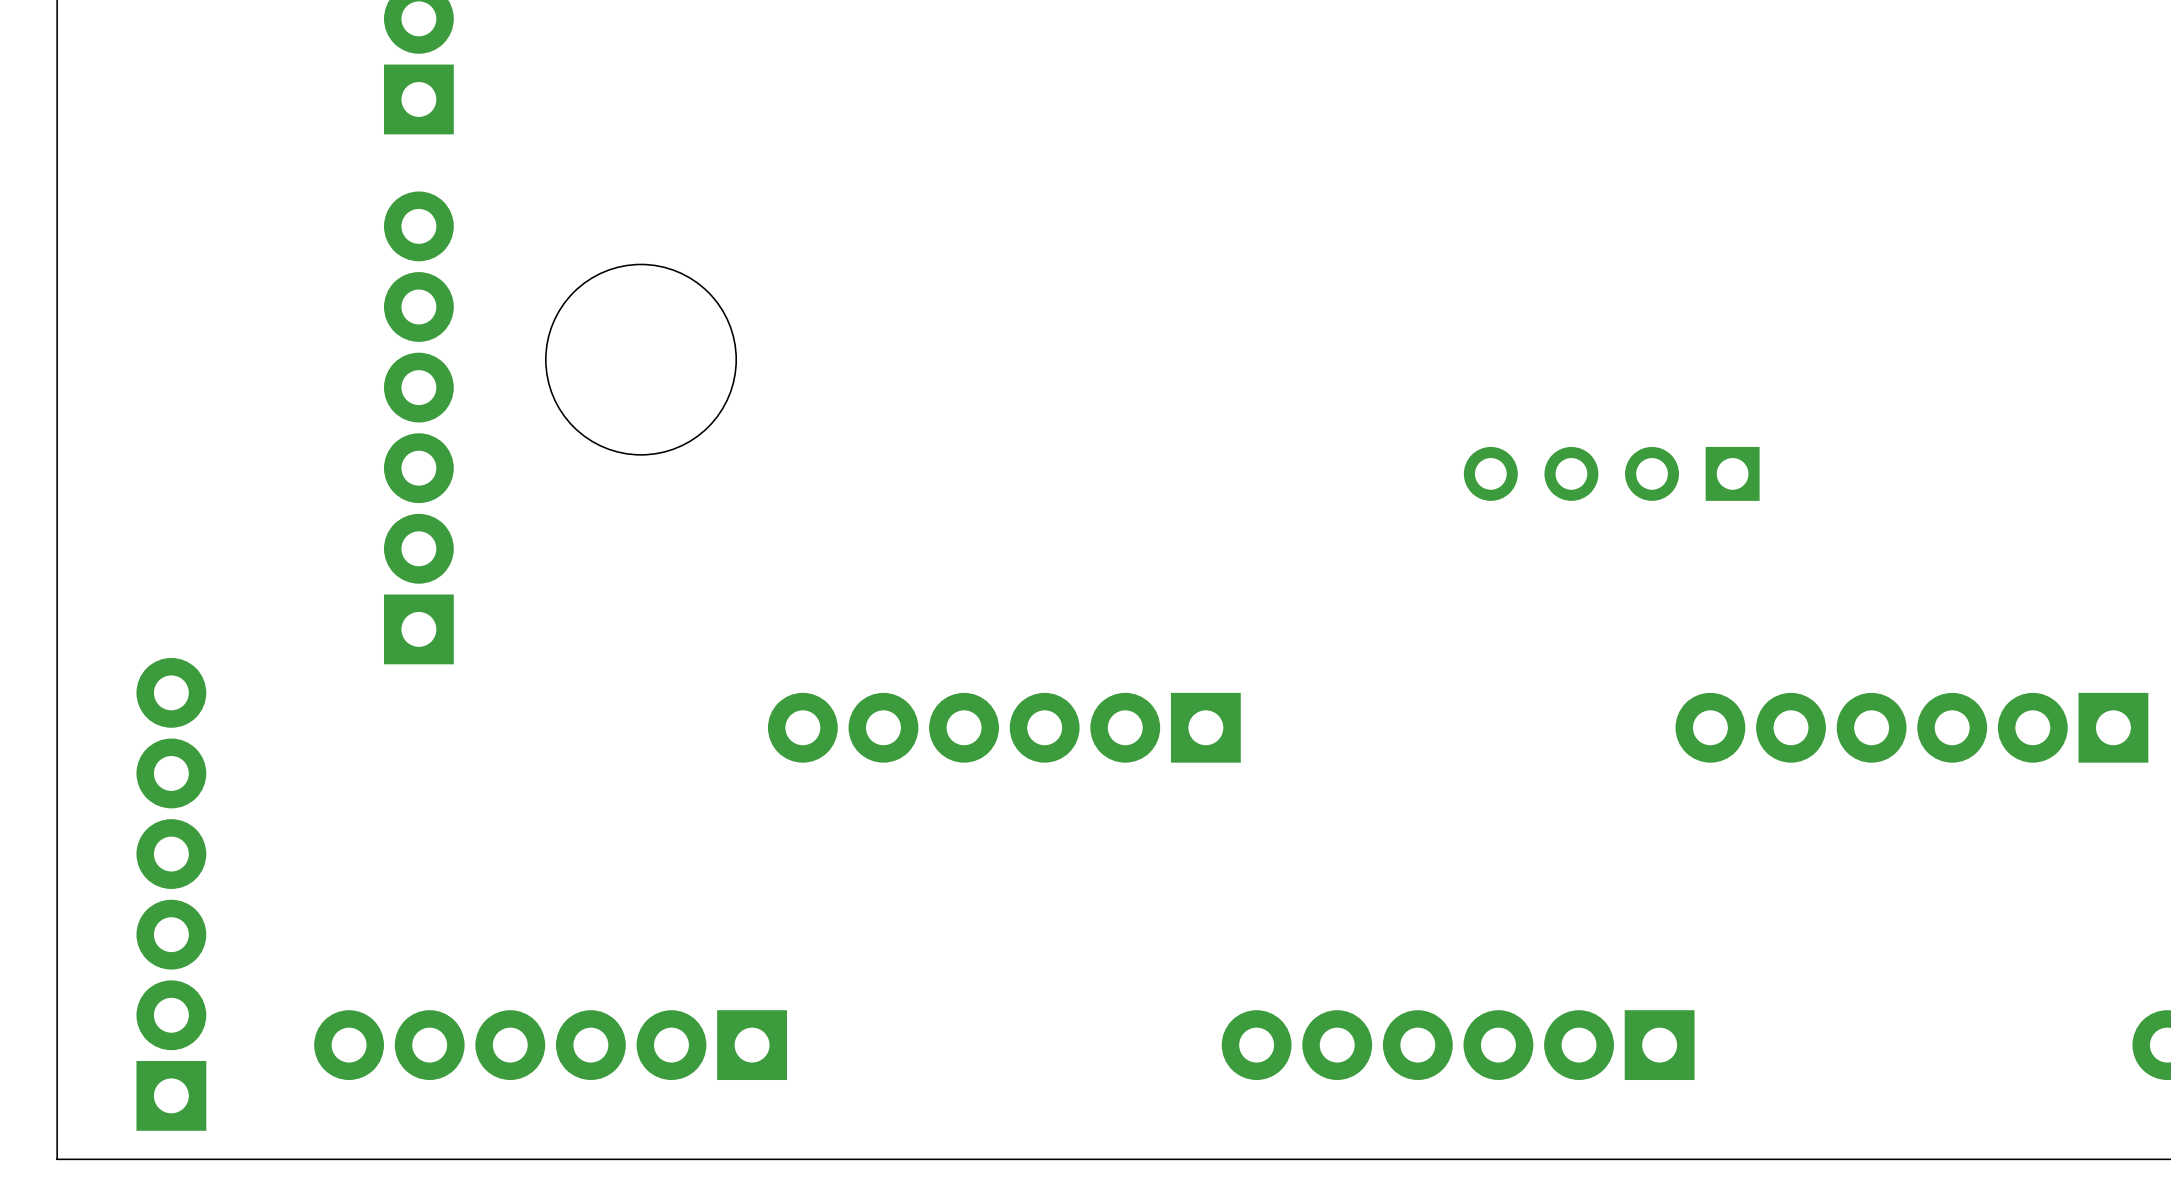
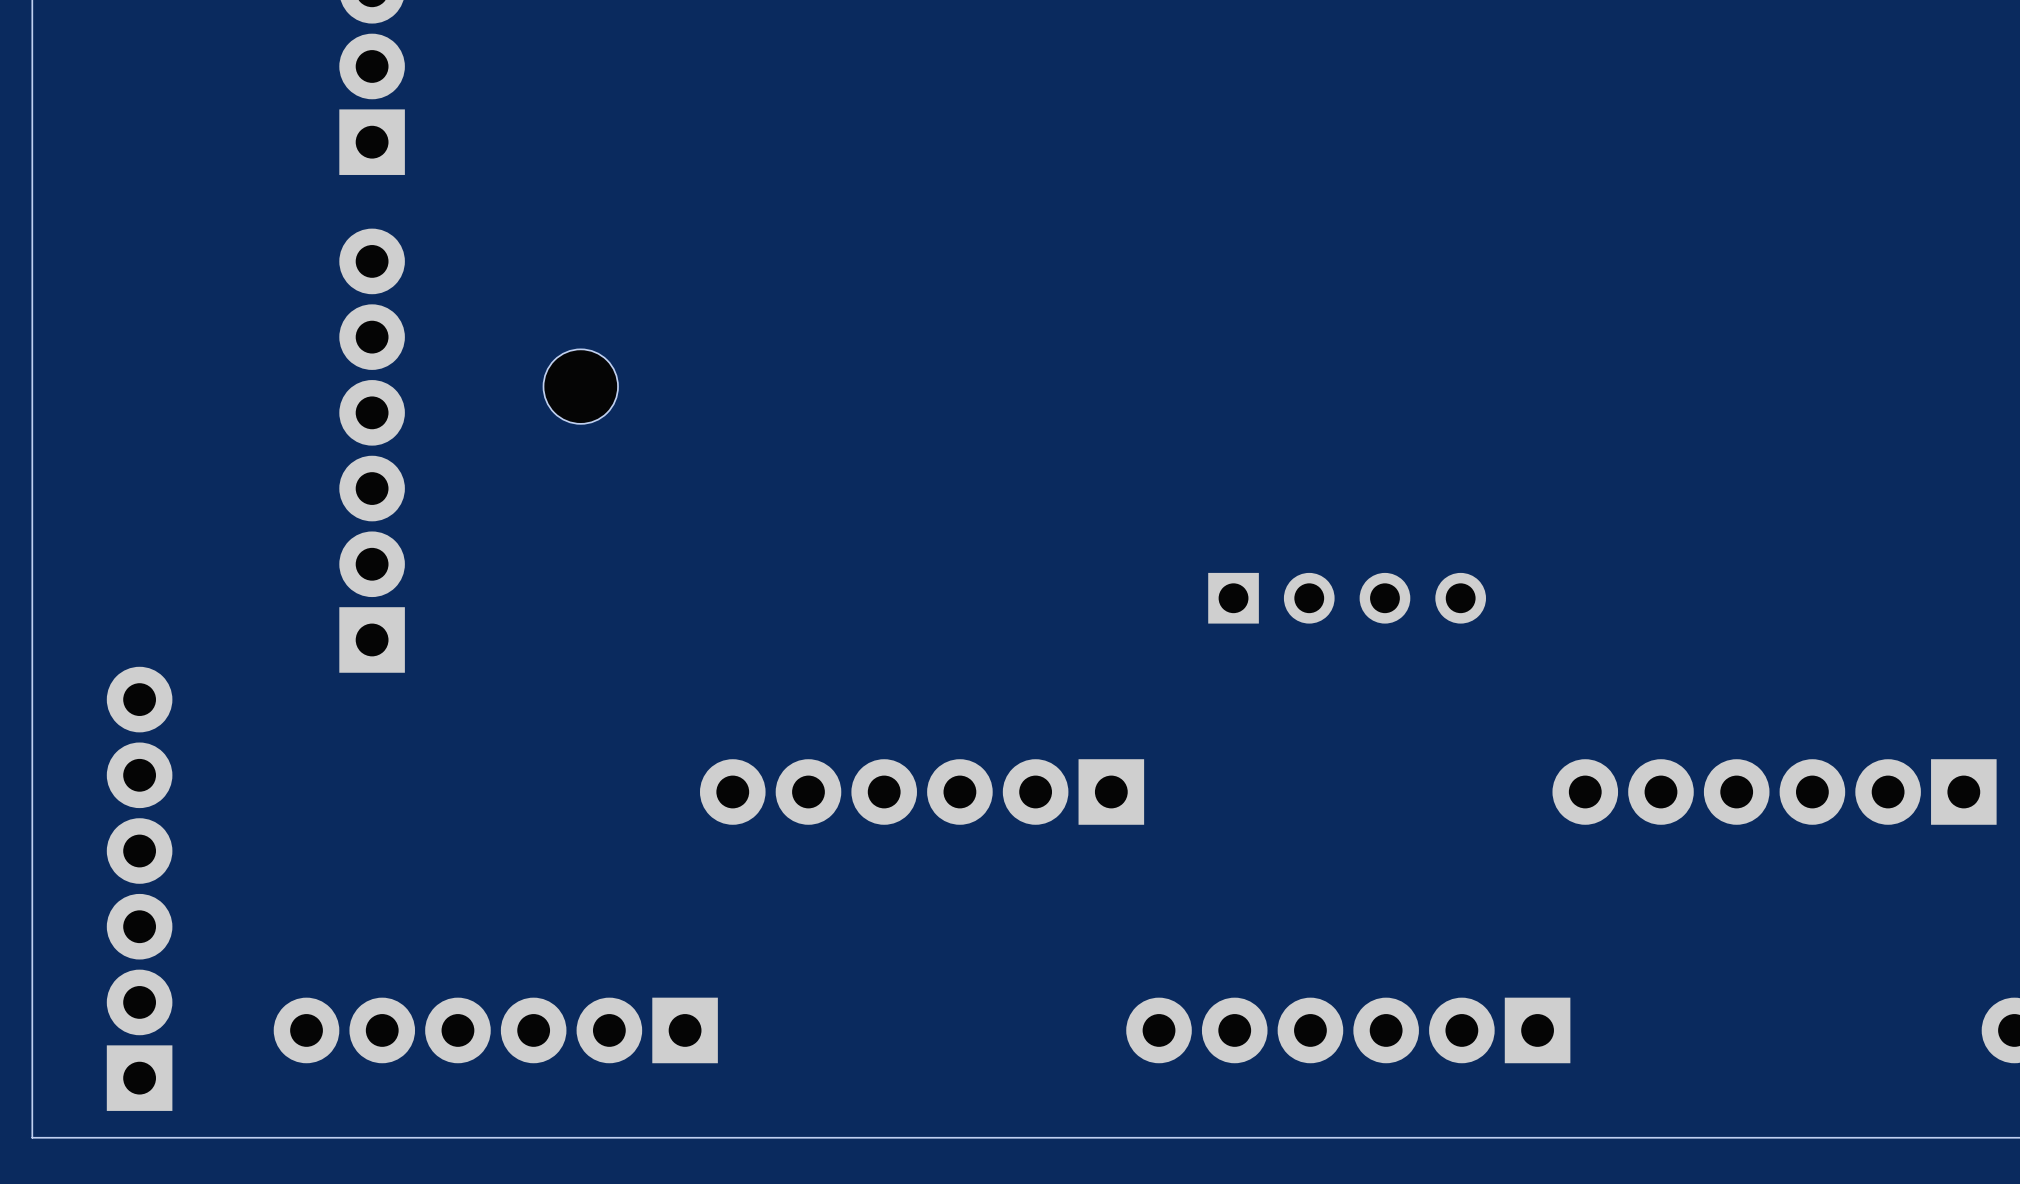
round board edge: [545, 263, 738, 456] -> none
part: none -> (580, 386)
part rotation: 0° (1611, 473) -> 180° (1347, 598)
part position: (1611, 473) -> (1347, 598)
part position: (1004, 727) -> (922, 791)
part position: (1911, 727) -> (1774, 791)

